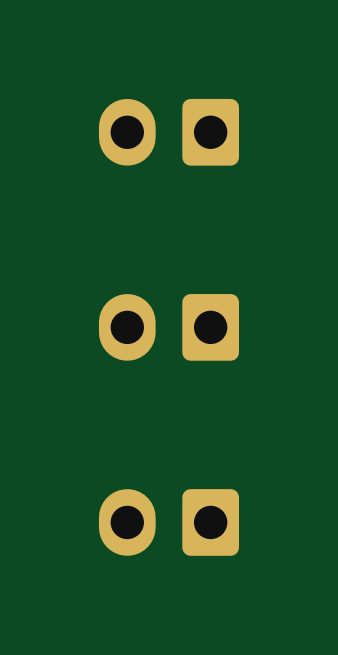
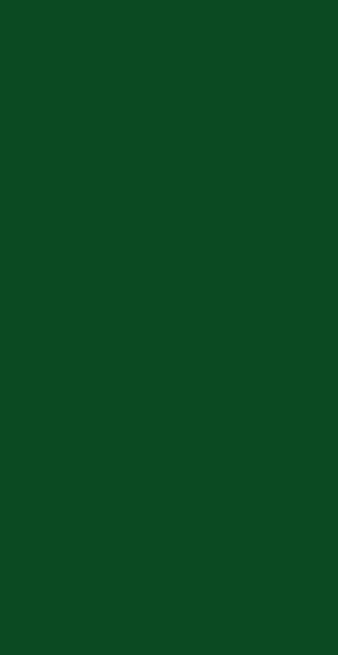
part: (168, 132) -> none
part: (168, 327) -> none
part: (168, 522) -> none

